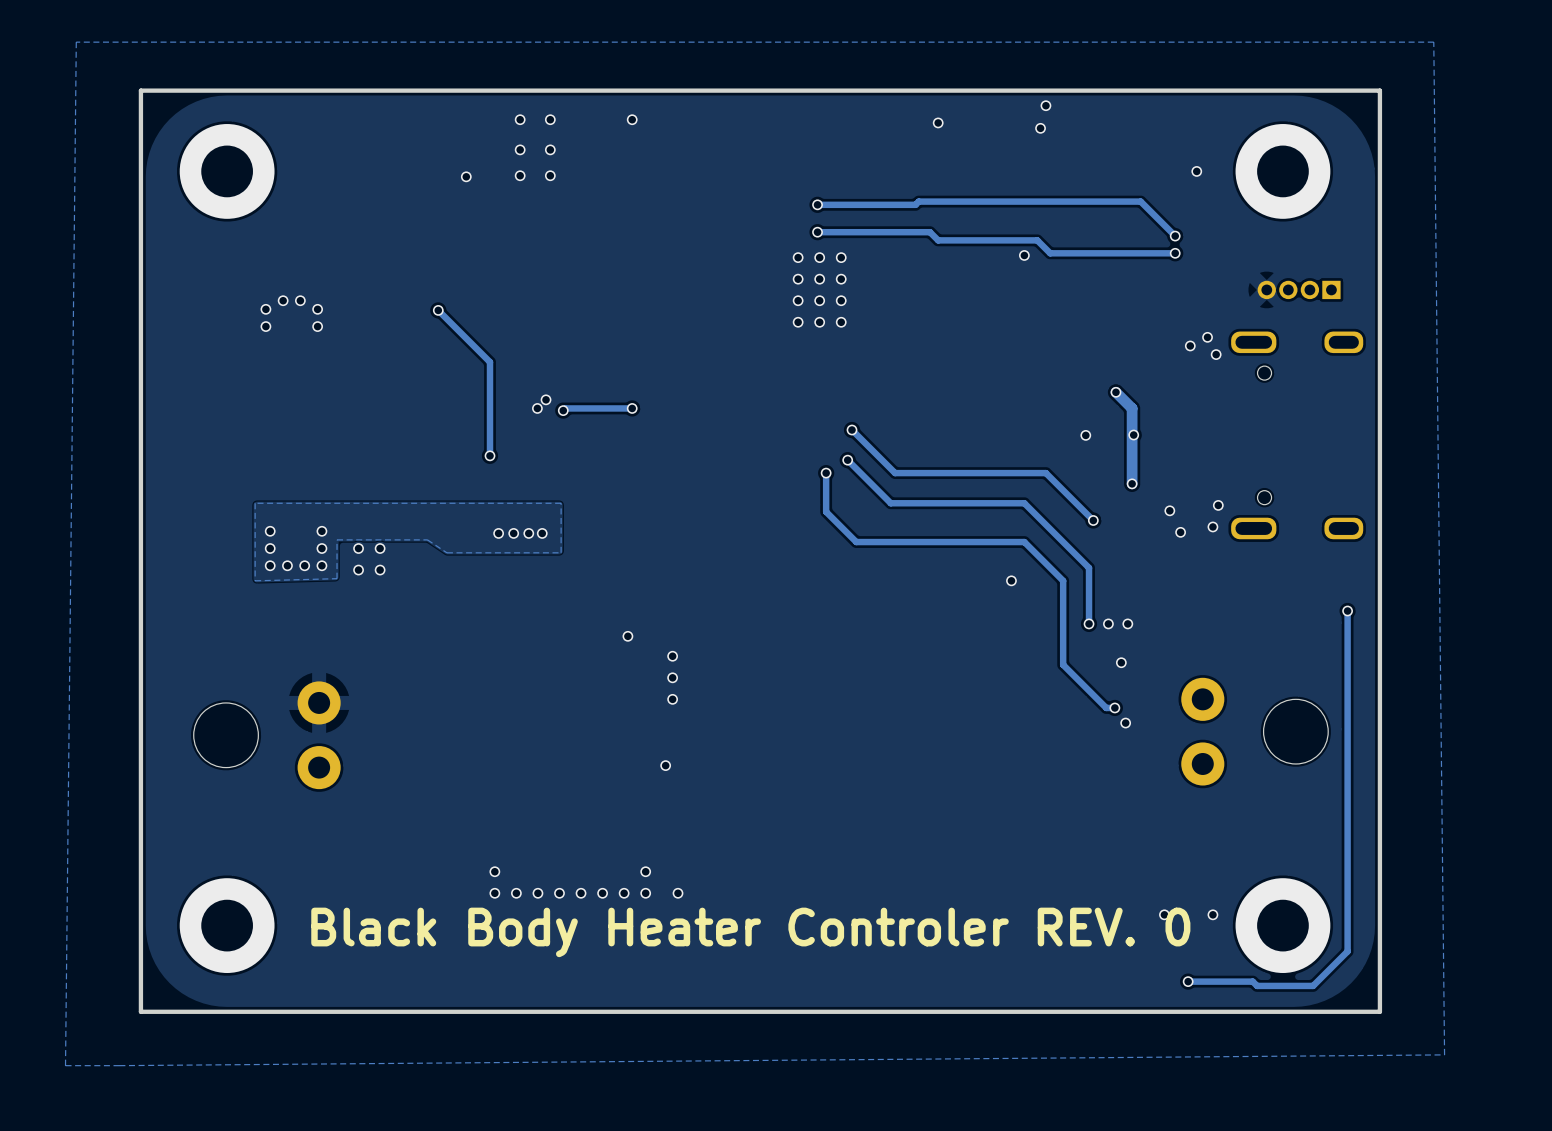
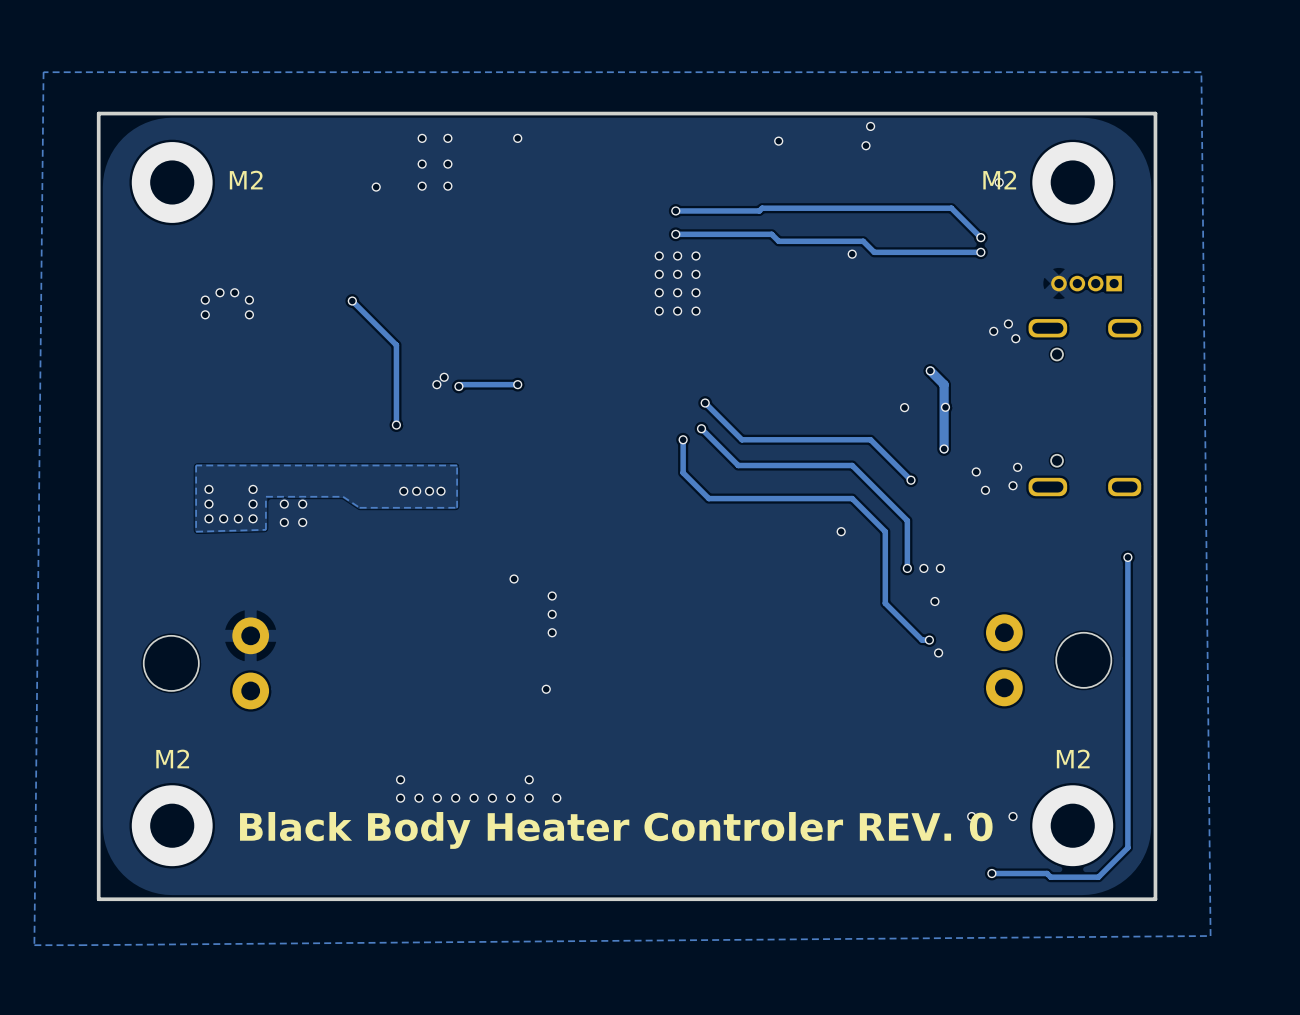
text: none -> M2 (246, 180)
text: none -> M2 (999, 180)
text: none -> M2 (172, 758)
text: none -> M2 (1073, 758)

